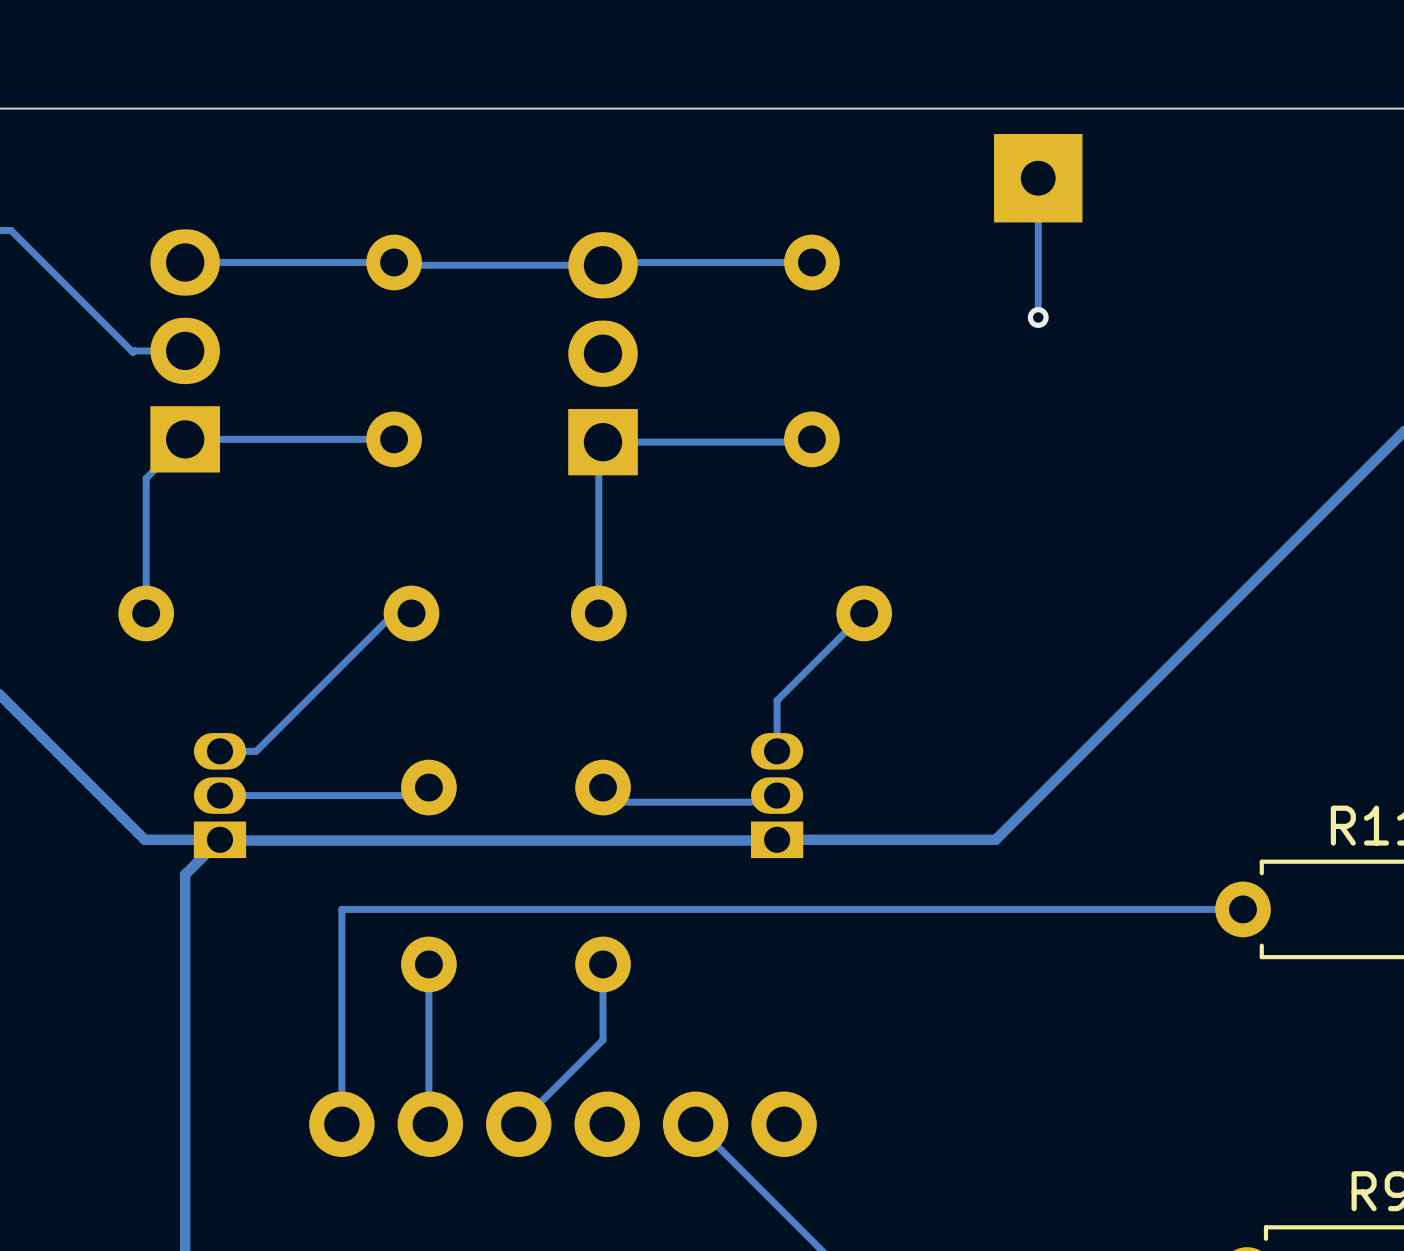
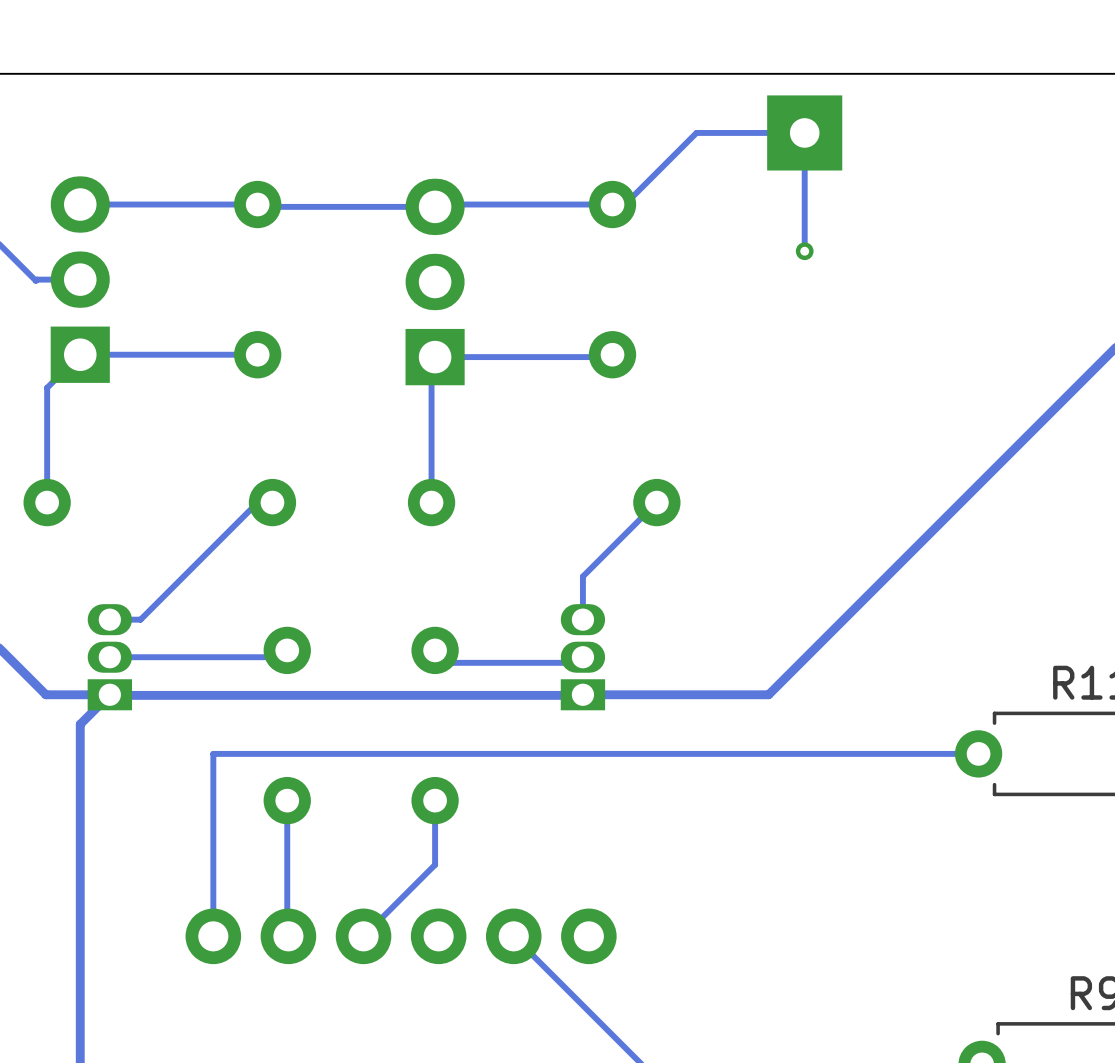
track: none -> (804, 132) (696, 132) (624, 204) (612, 204)

